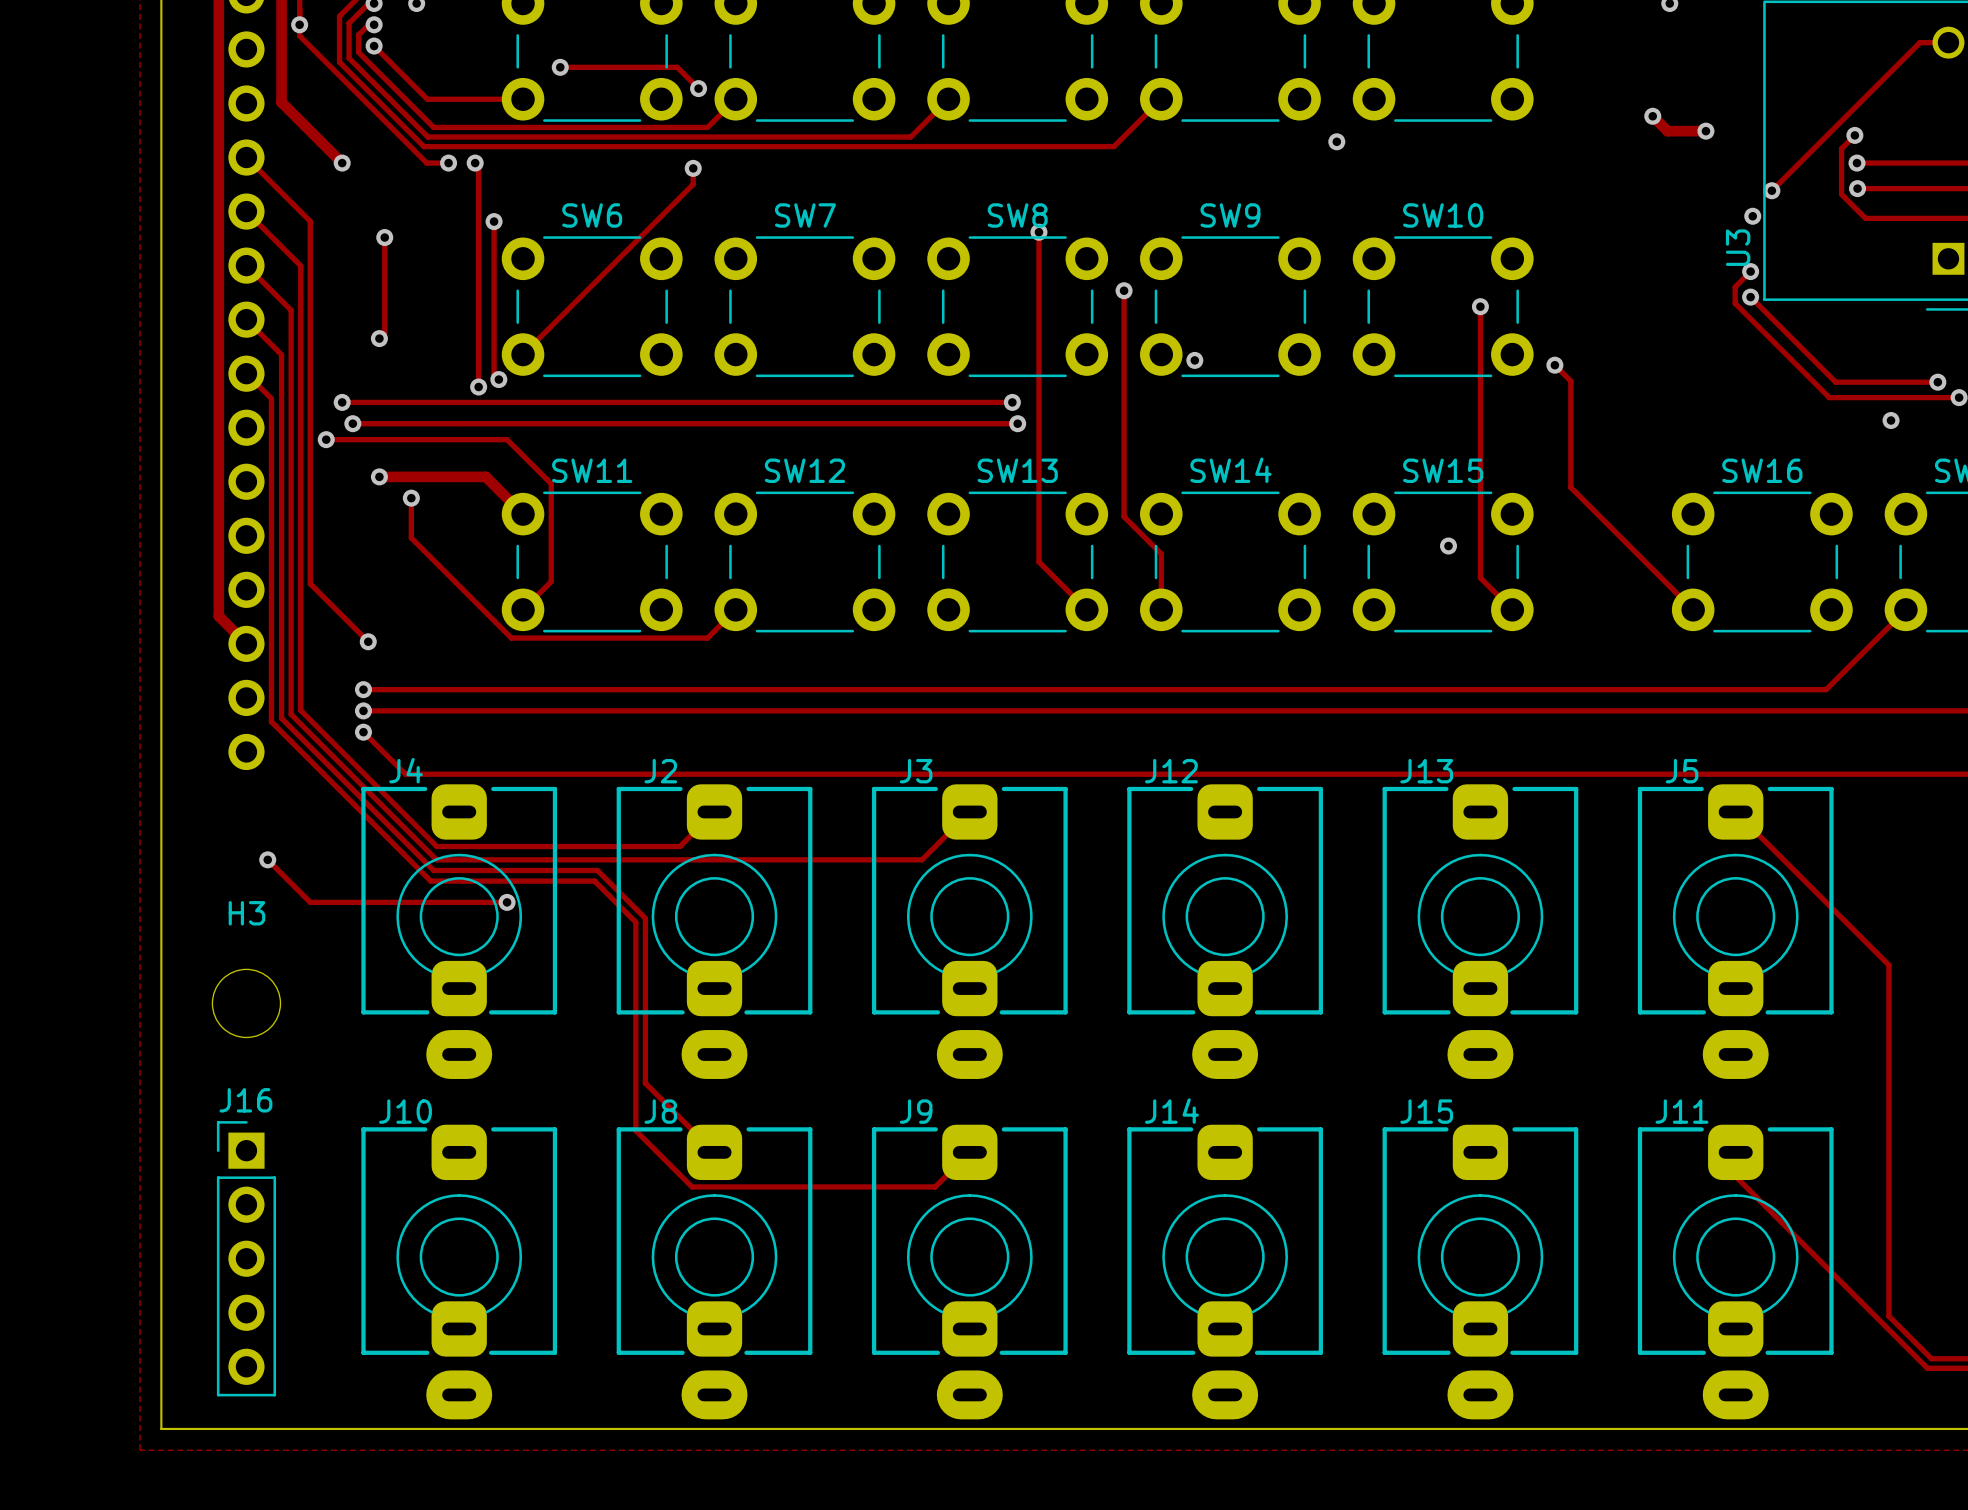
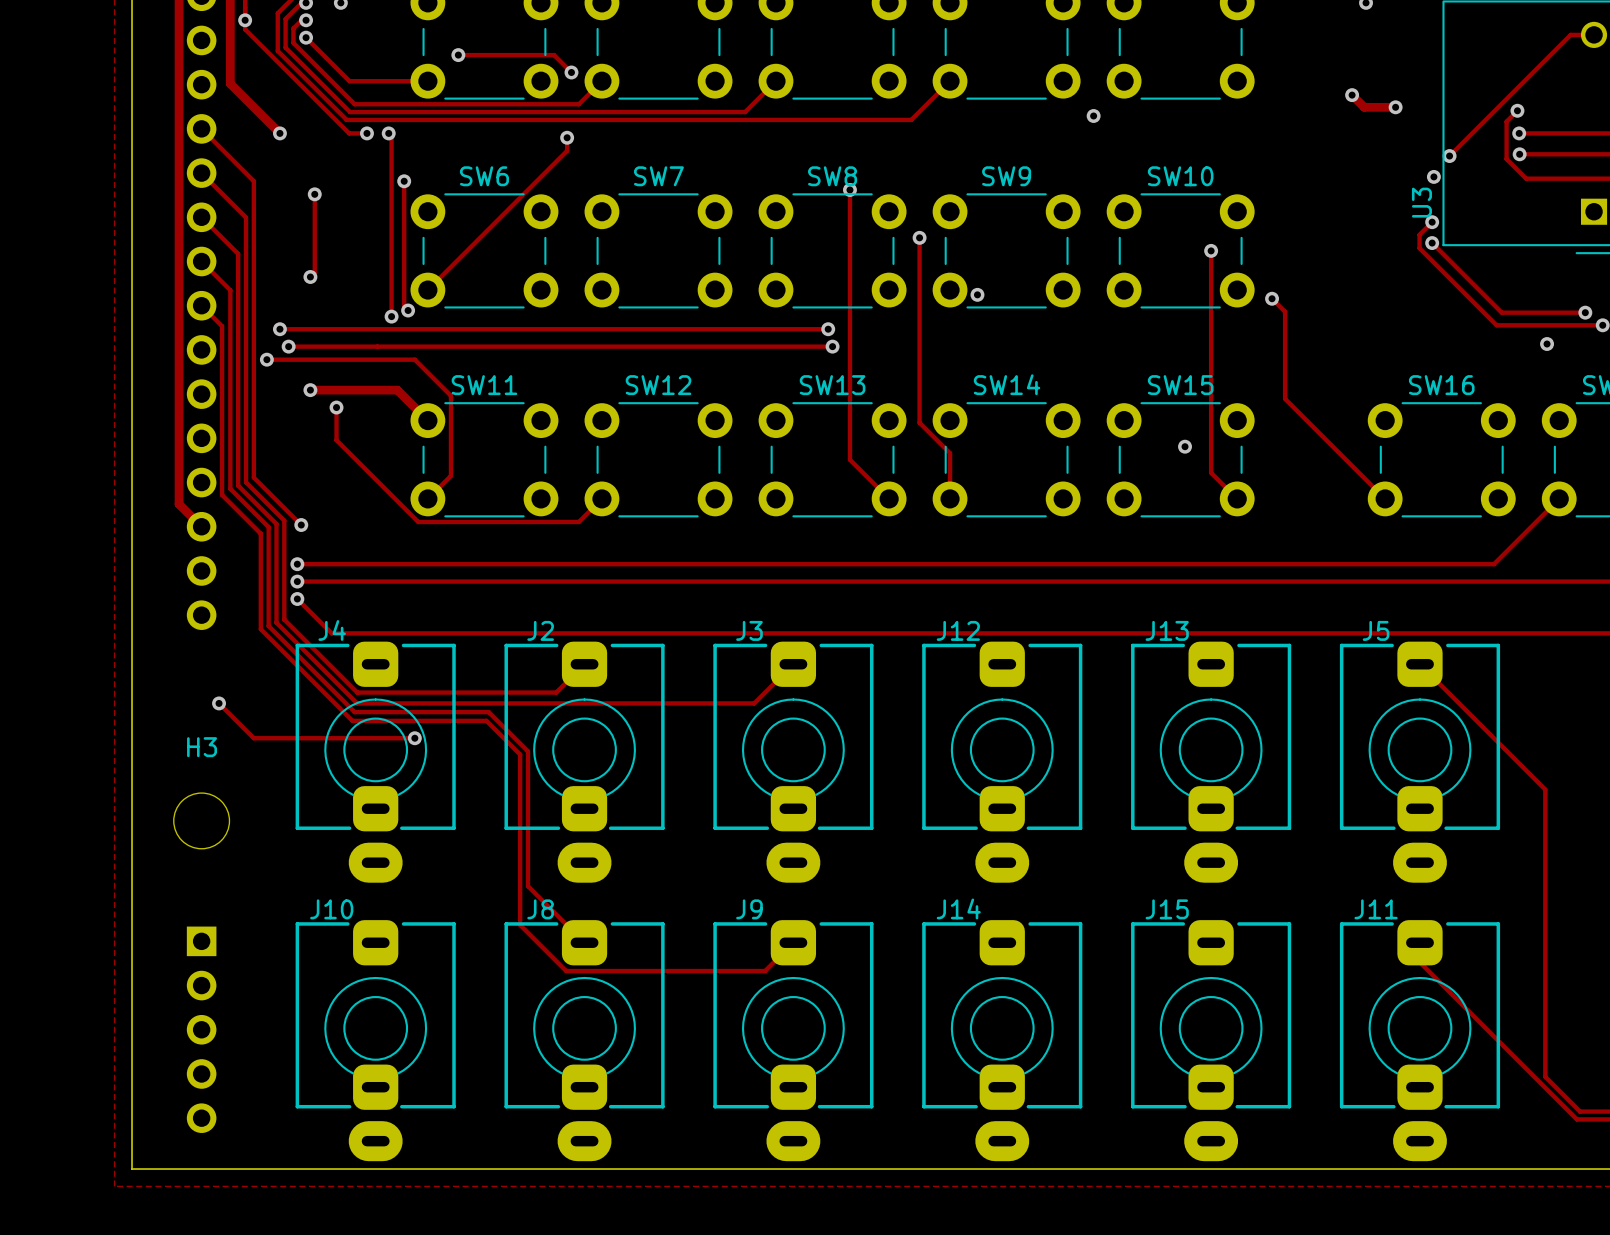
track: (300, 589) (300, 710) (347, 757) -> (246, 482) (284, 520) (284, 619)
track: (291, 593) (291, 714) (337, 761) -> (238, 485) (276, 523) (276, 622)
track: (281, 597) (281, 718) (328, 765) -> (230, 488) (268, 527) (268, 626)
track: (271, 605) (271, 721) (318, 769) -> (222, 495) (260, 533) (260, 629)
J16 side: top (246, 1258) -> bottom (201, 1029)

